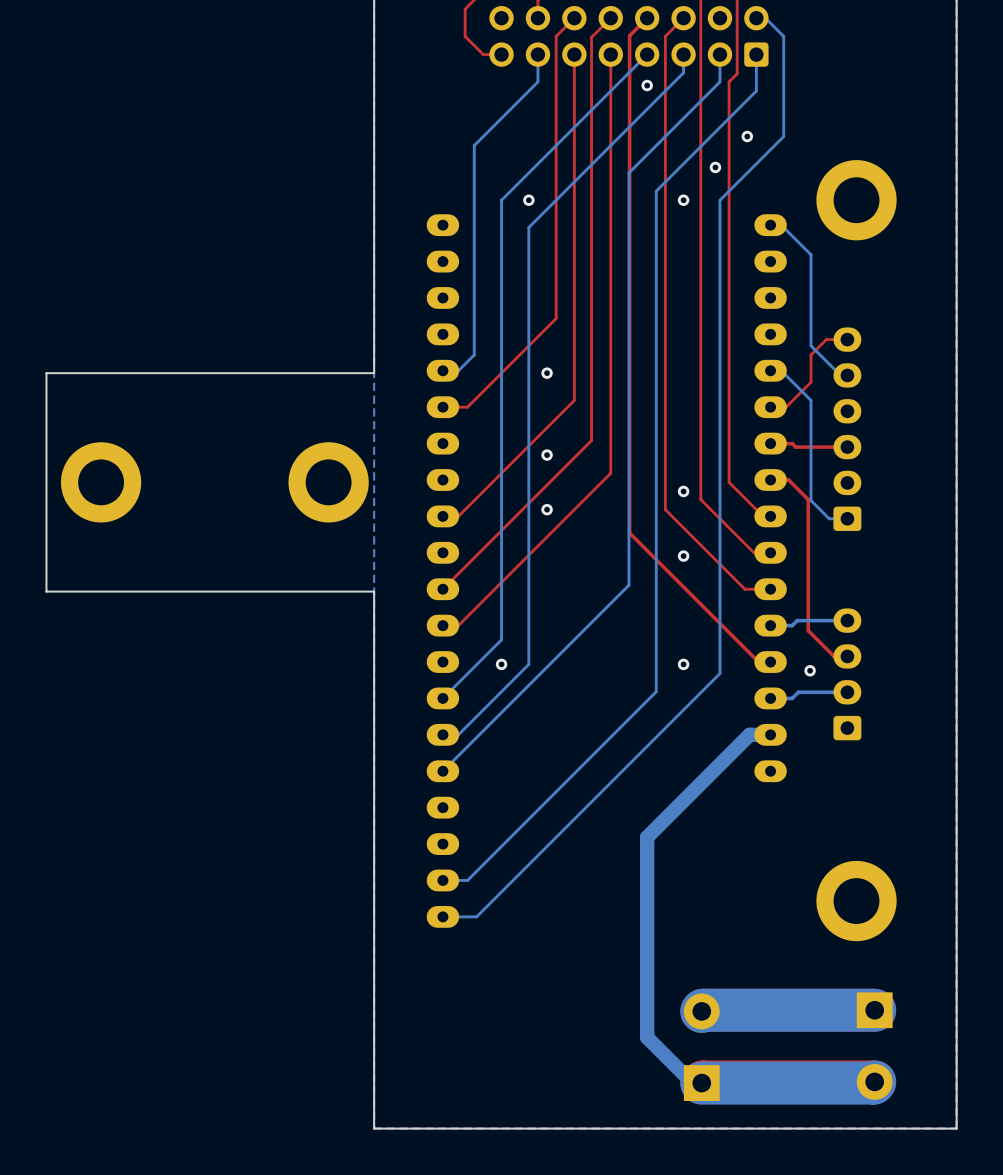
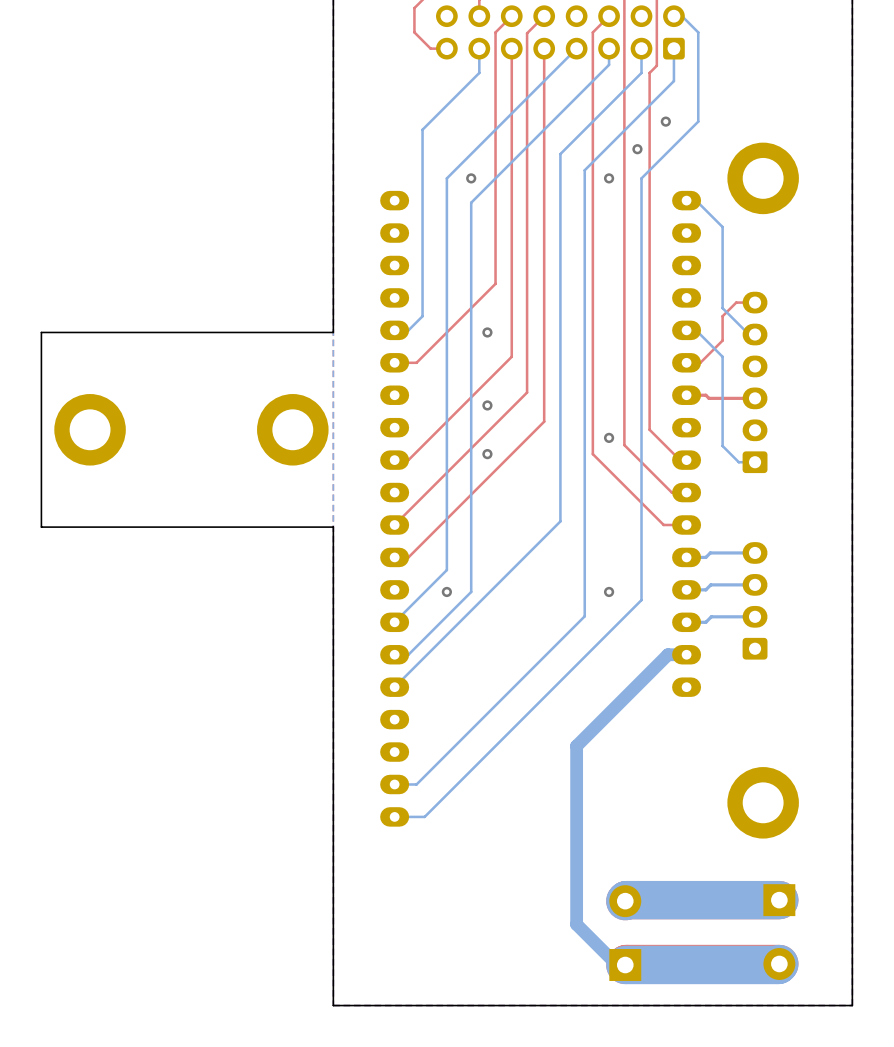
top track: (647, 18) (629, 35) (629, 533) (758, 662) (770, 662) -> none
via: (647, 85) -> none
top track: (770, 480) (788, 480) (808, 499) (808, 630) (834, 656) (847, 656) -> none
via: (683, 556) -> none
bottom track: none -> (755, 584) (710, 584) (705, 589) (686, 589)
via: (810, 670) -> none

